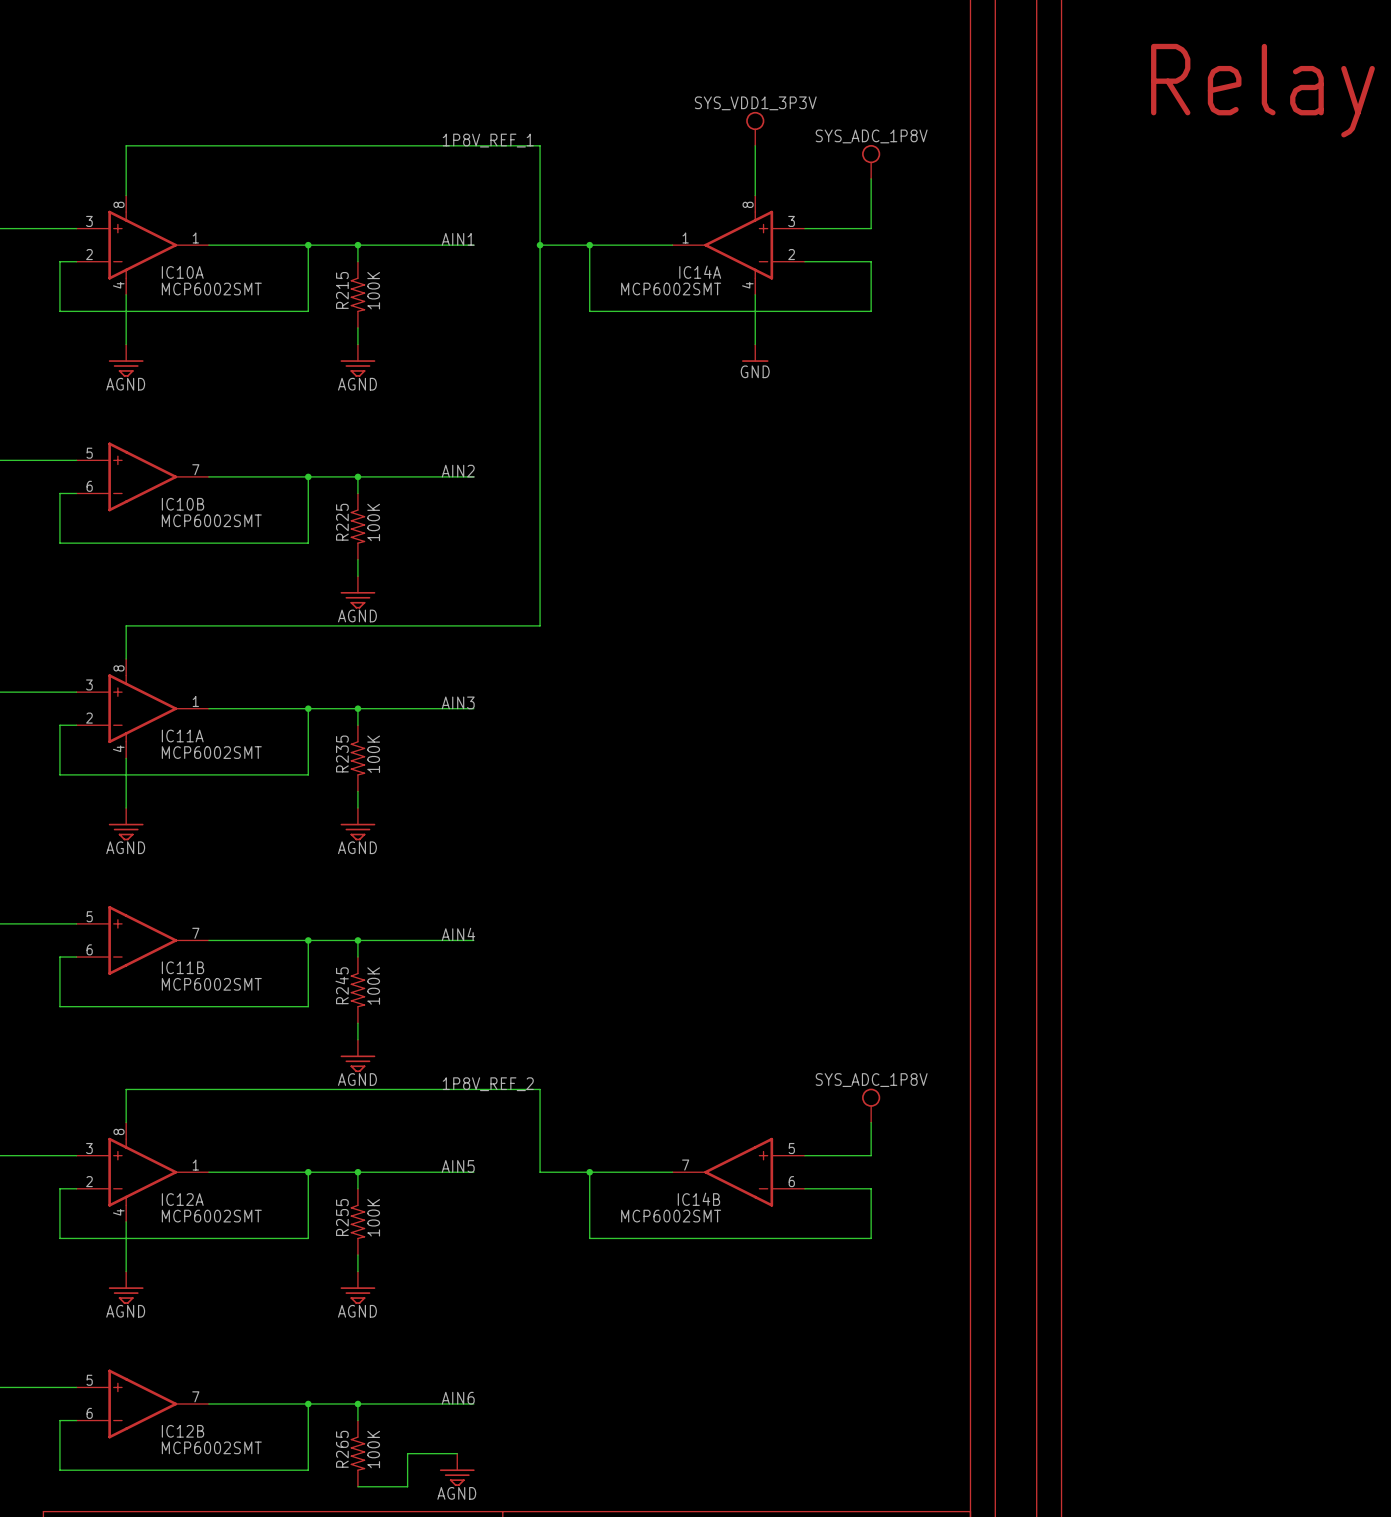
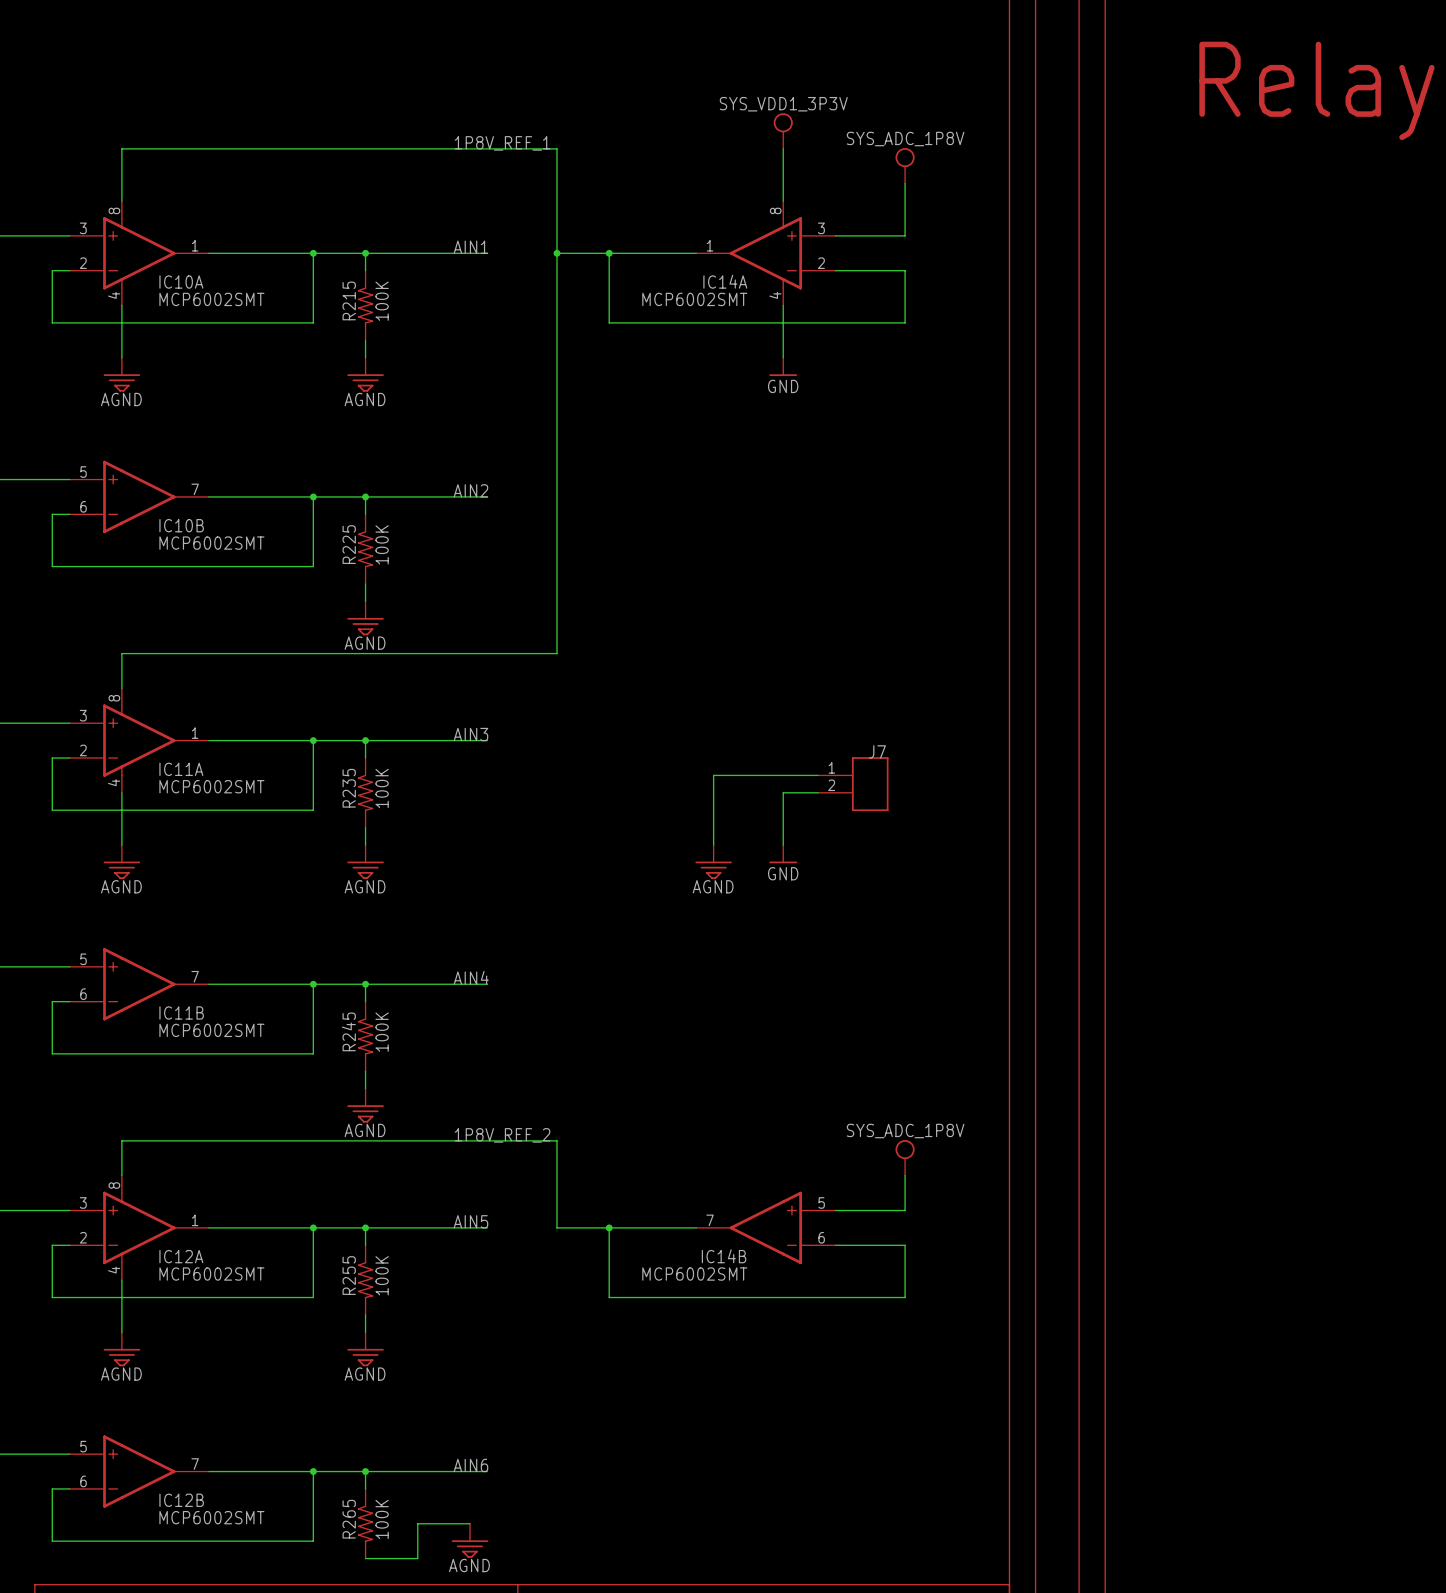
wire: none -> (818, 775) (713, 775) (713, 845)
J7: none -> (853, 784)
wire: none -> (818, 792) (783, 792) (783, 845)
power symbol: none -> GND (783, 854)
power symbol: none -> AGND (713, 861)

